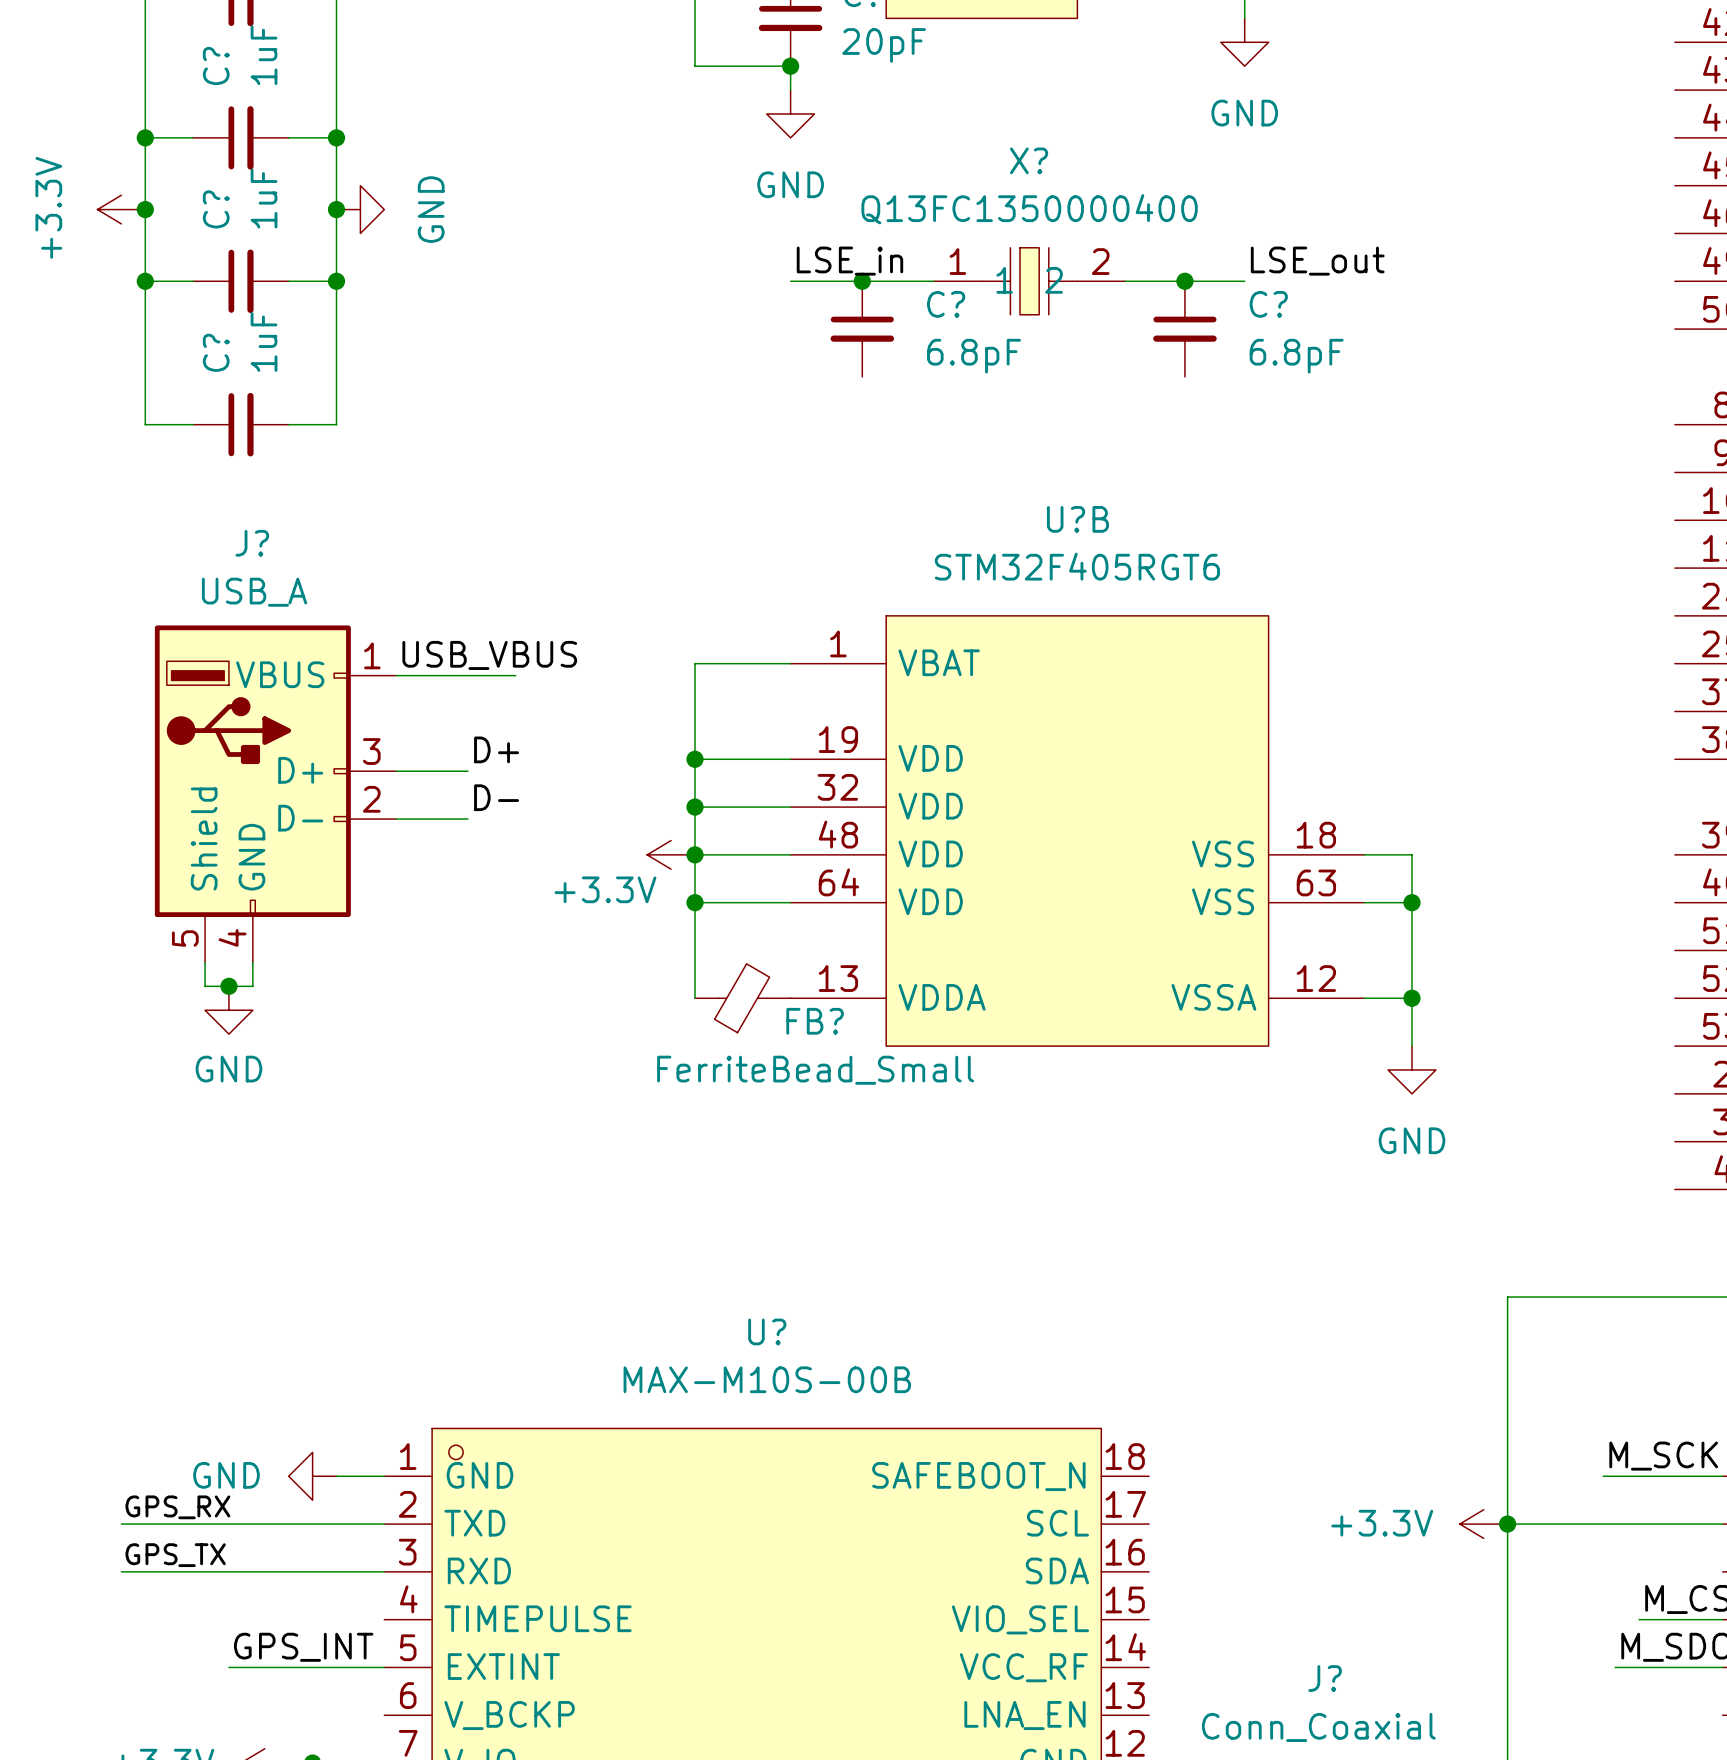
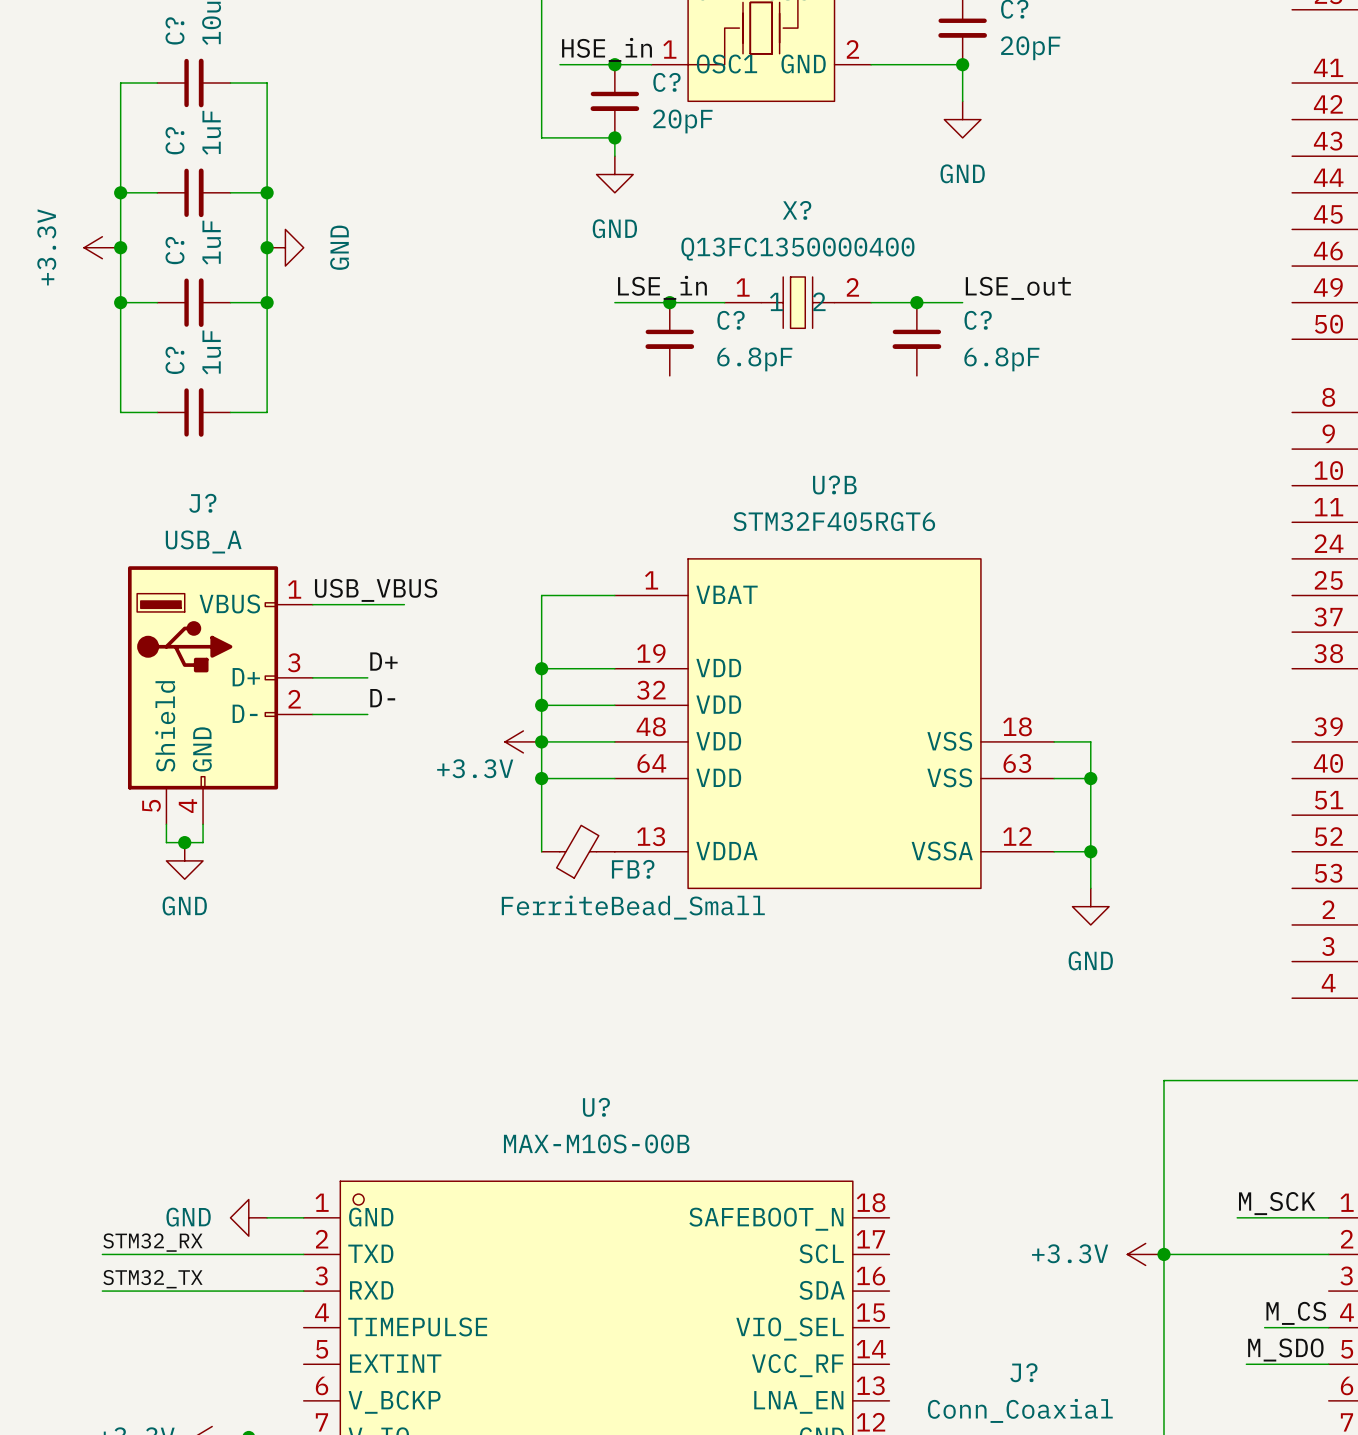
label: GPS_RX (177, 1507) -> STM32_RX (152, 1242)
label: GPS_TX (175, 1555) -> STM32_TX (152, 1279)
label: GPS_INT (303, 1647) -> none
wire: (228, 1667) (384, 1667) -> none

